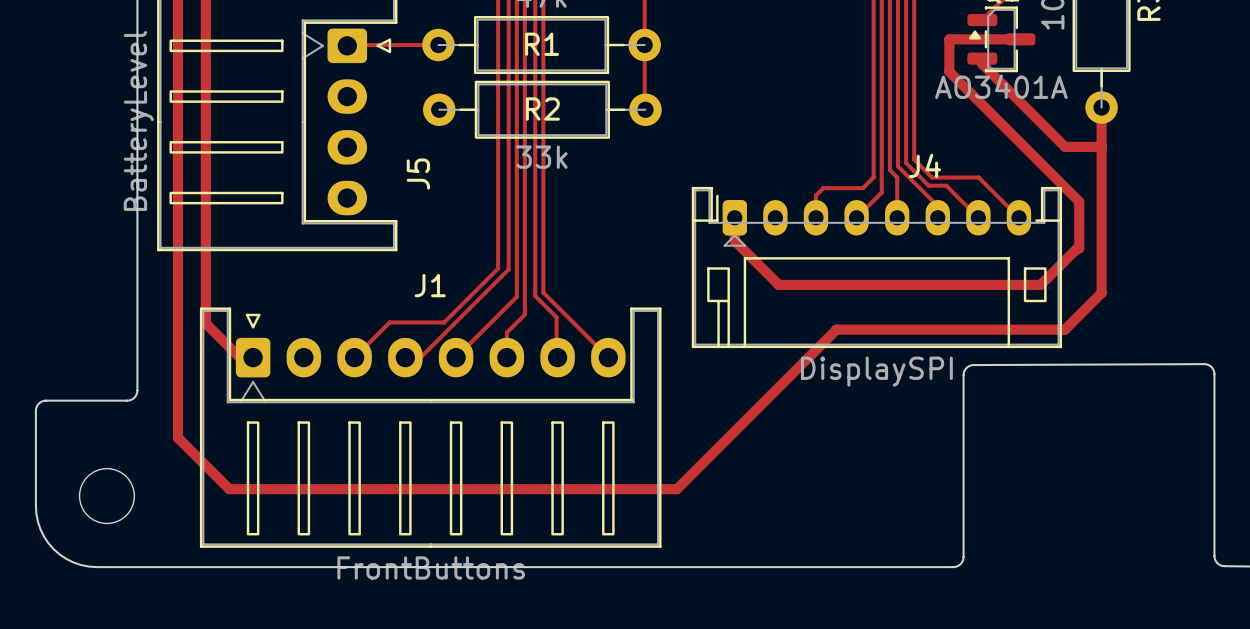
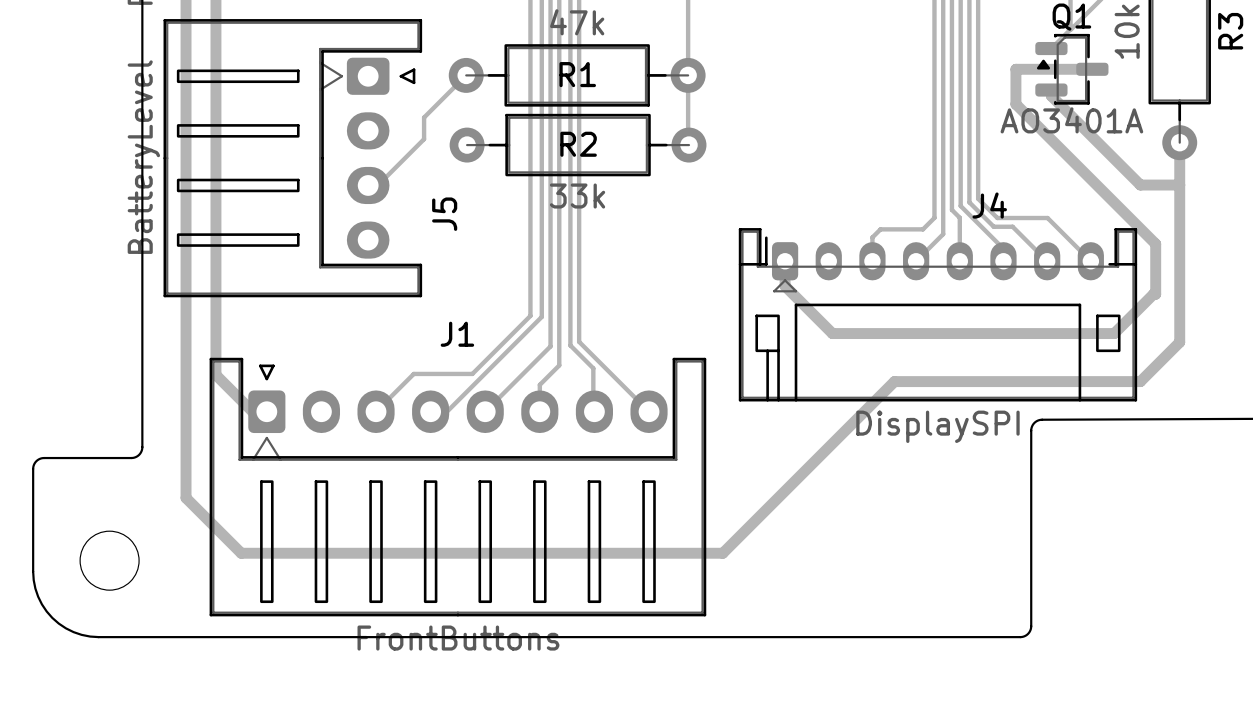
track: (348, 45) (438, 45) -> (377, 185) (424, 139) (424, 117) (466, 75)

